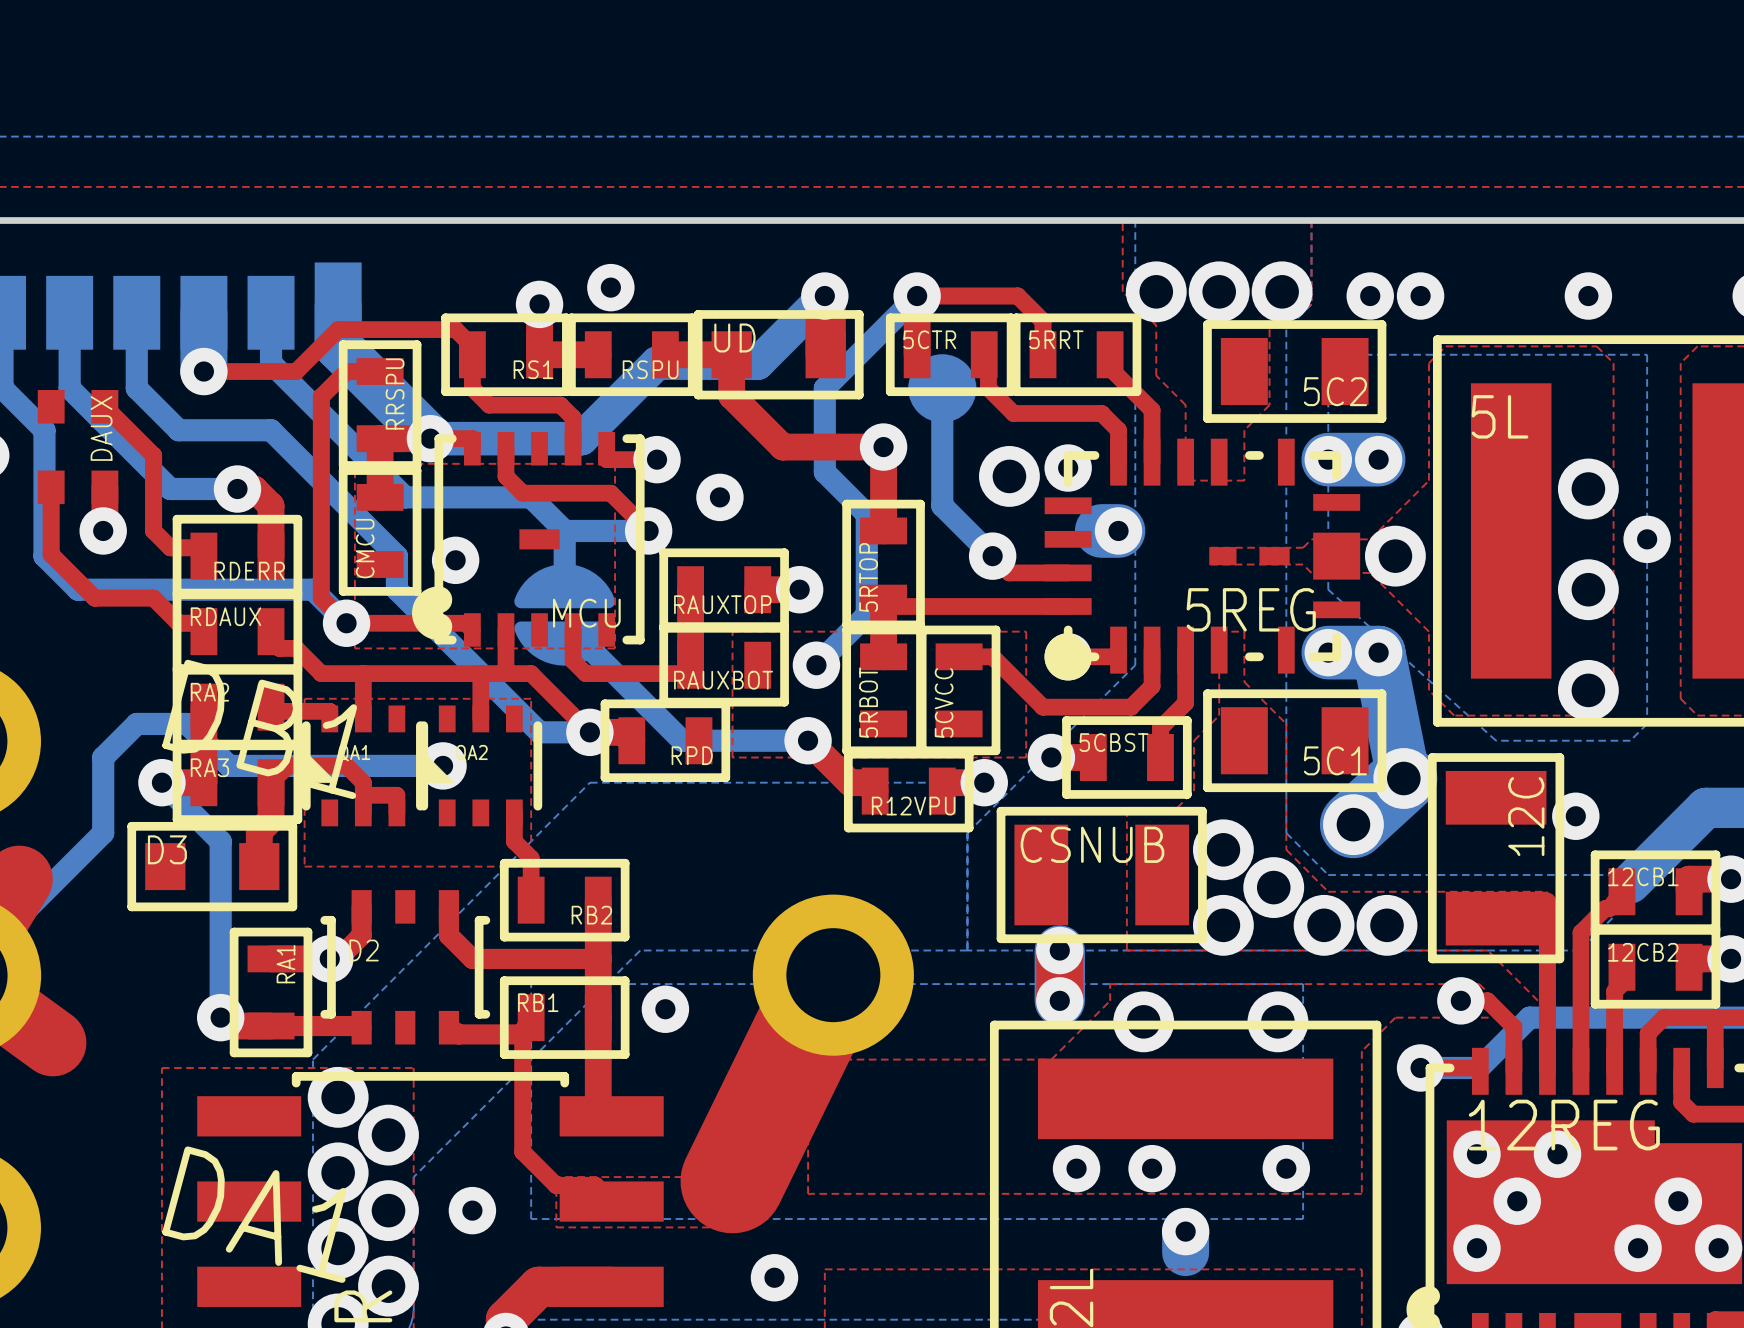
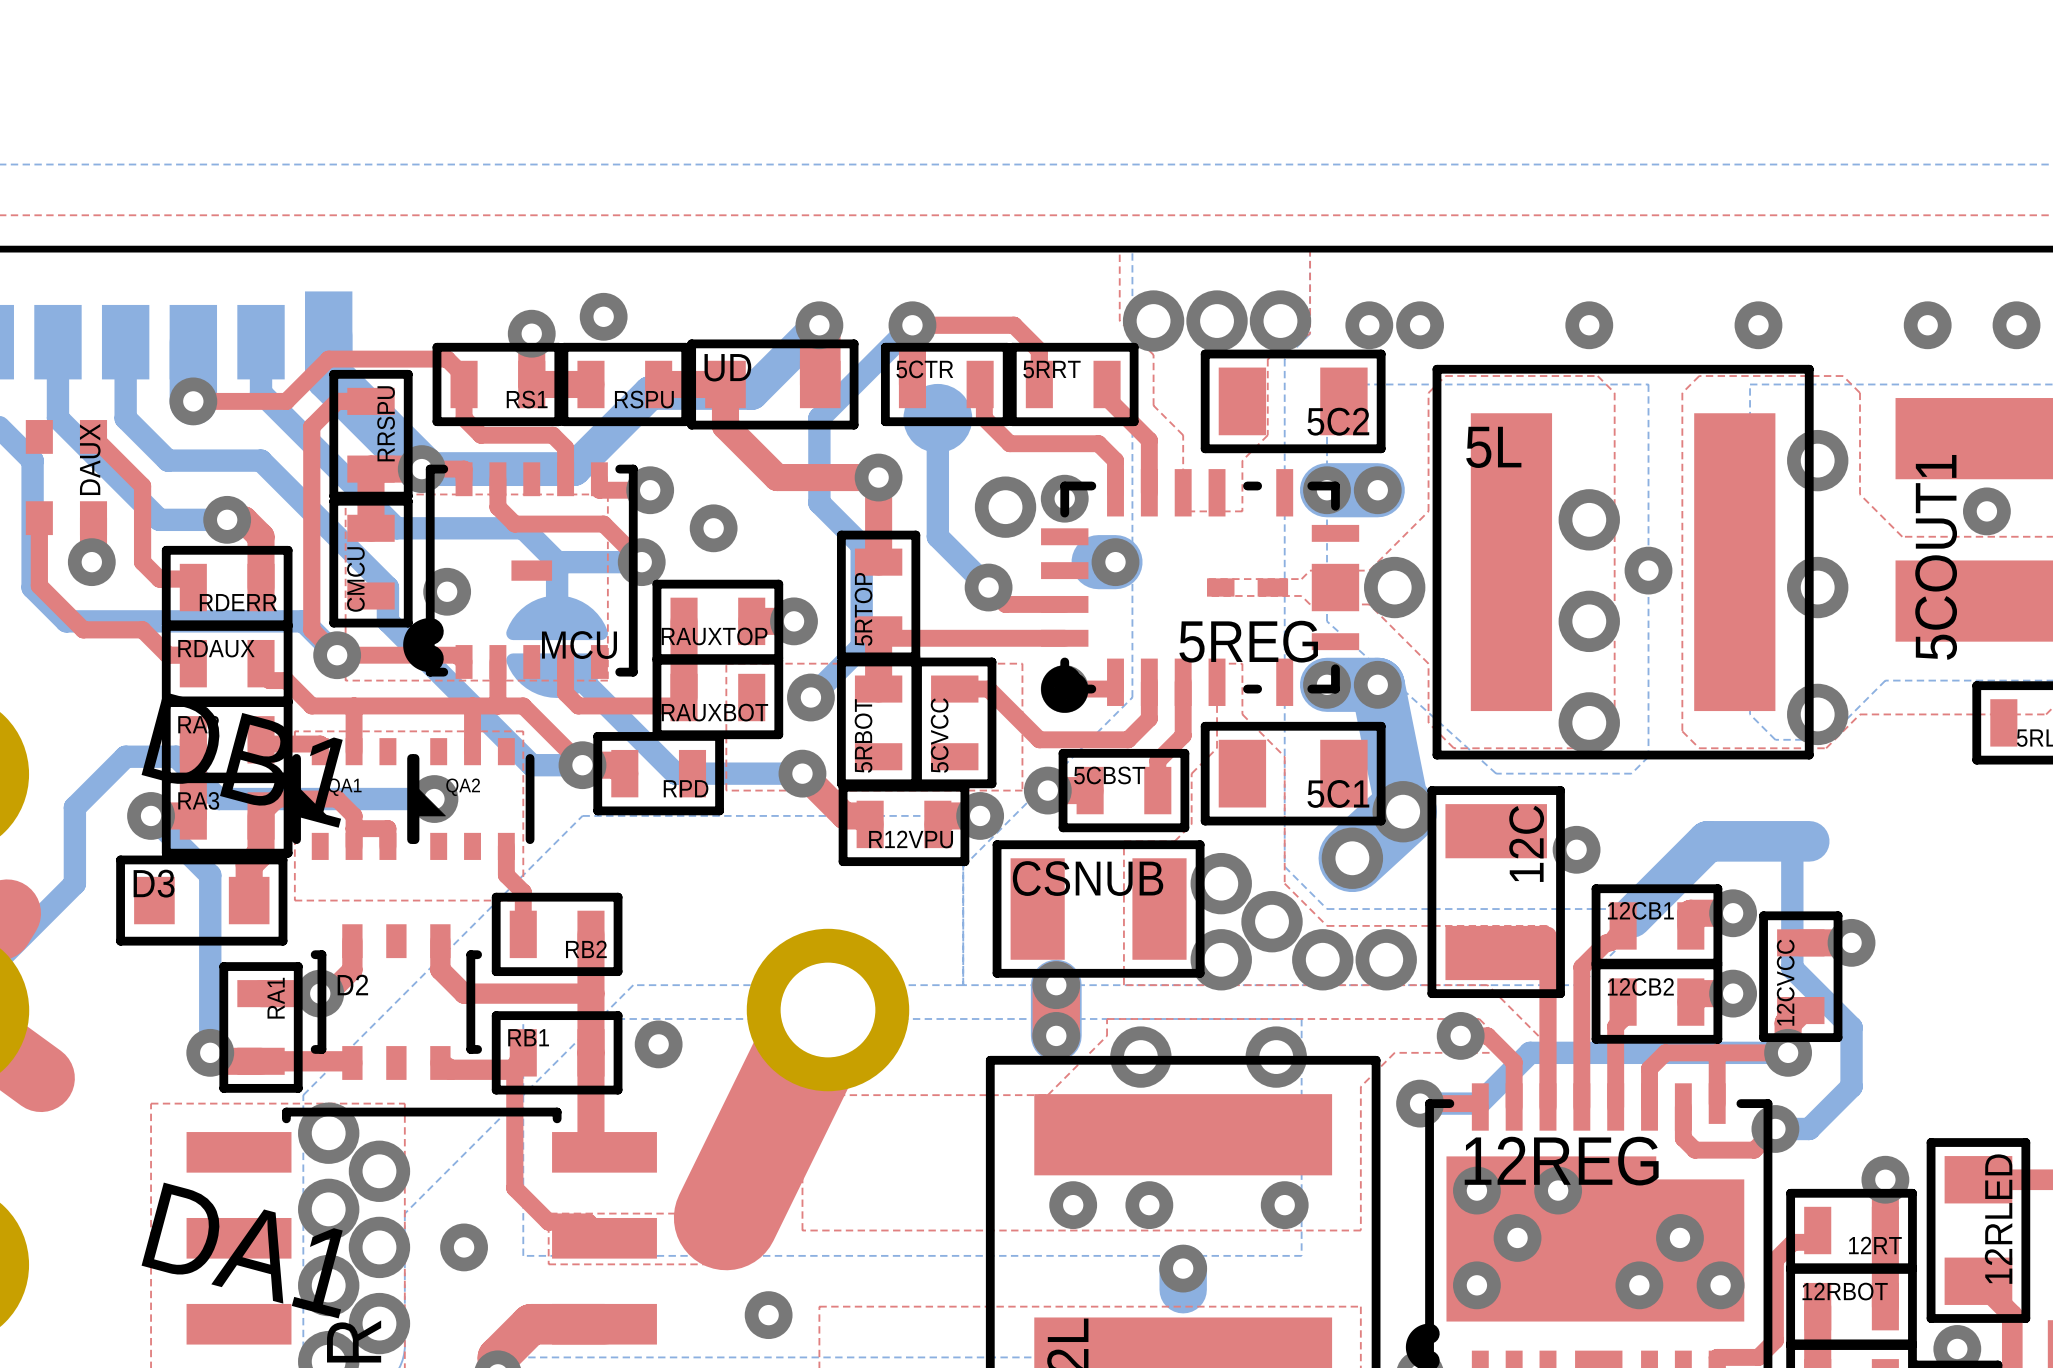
bottom track: (103, 757) (103, 833) (86, 849) -> (91, 790) (74, 807) (74, 883)

